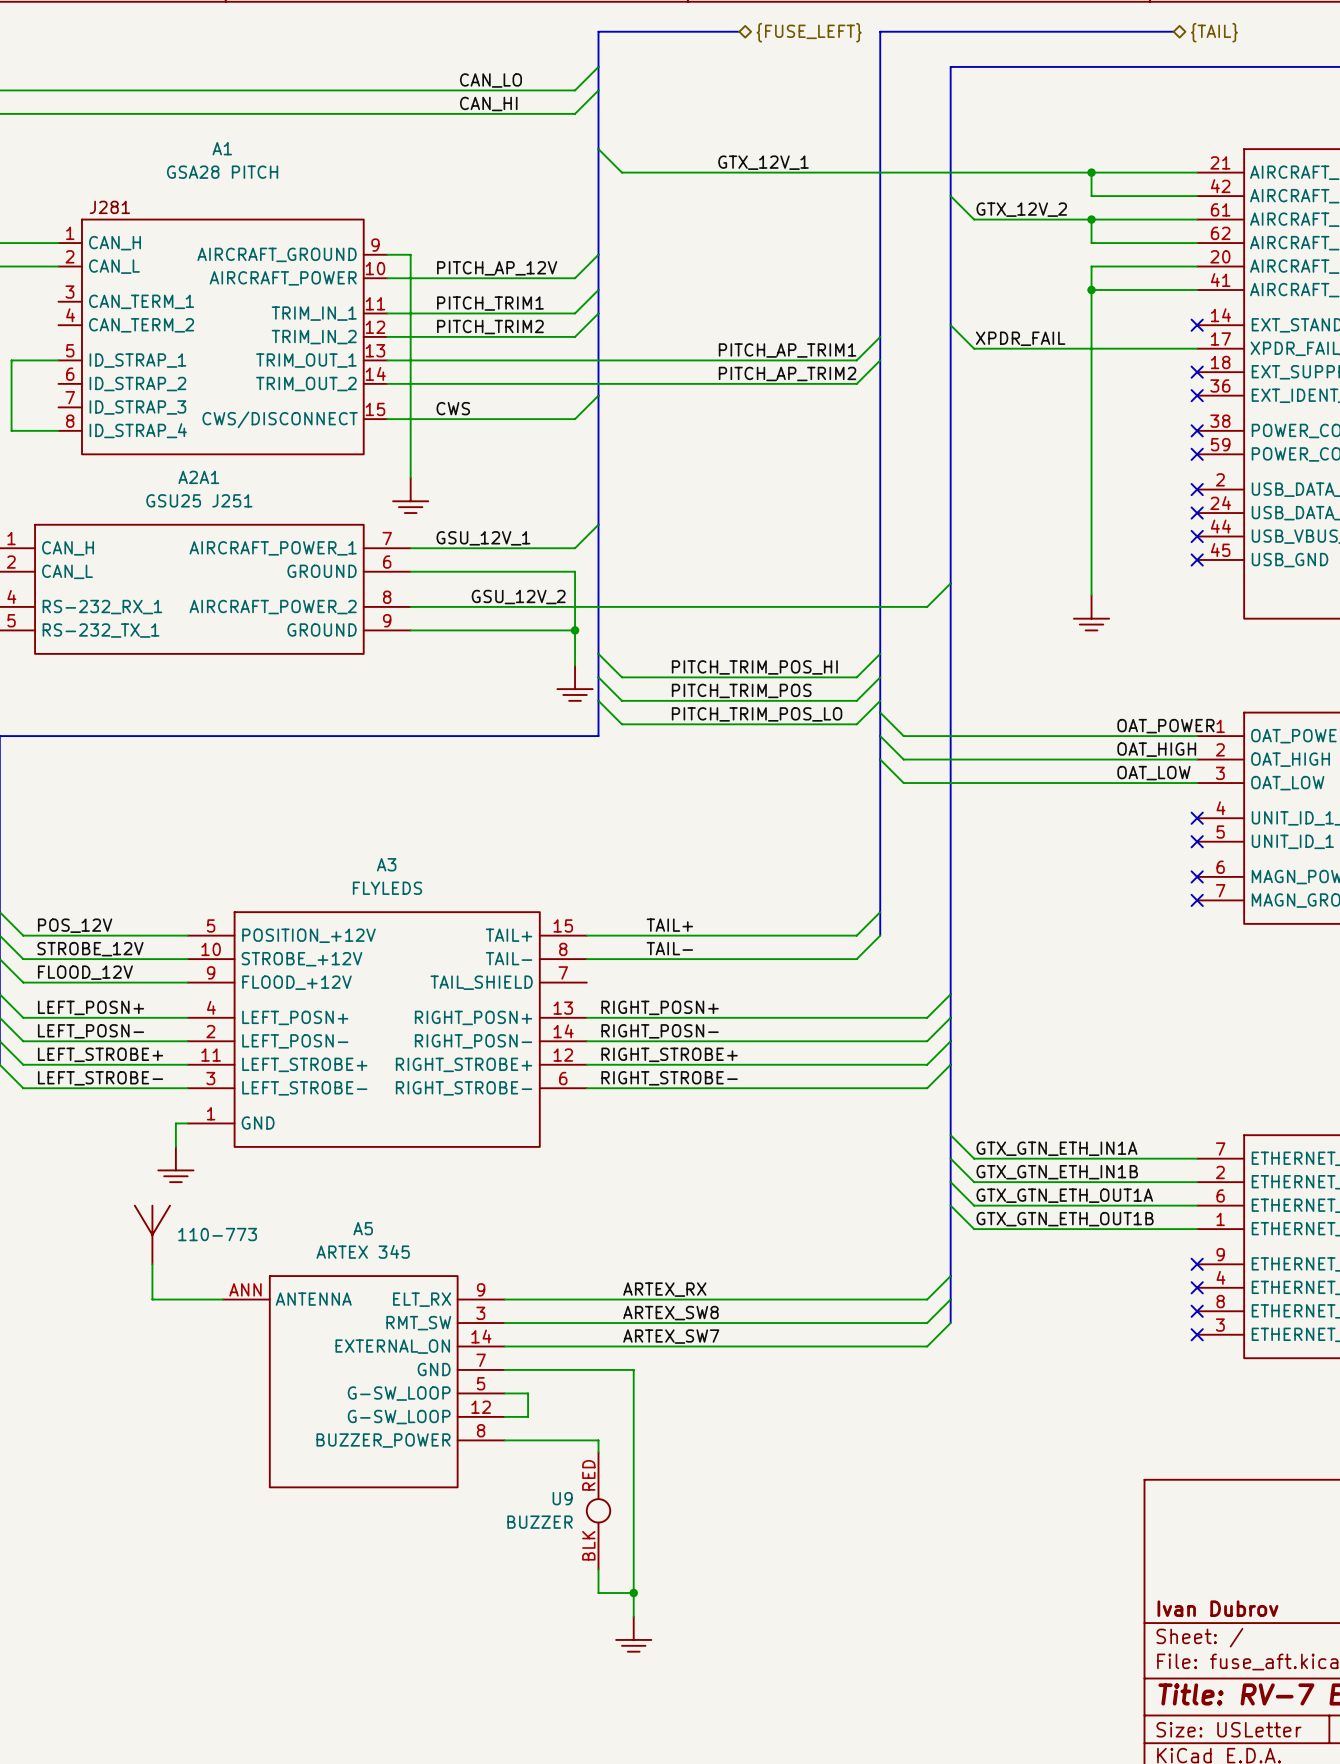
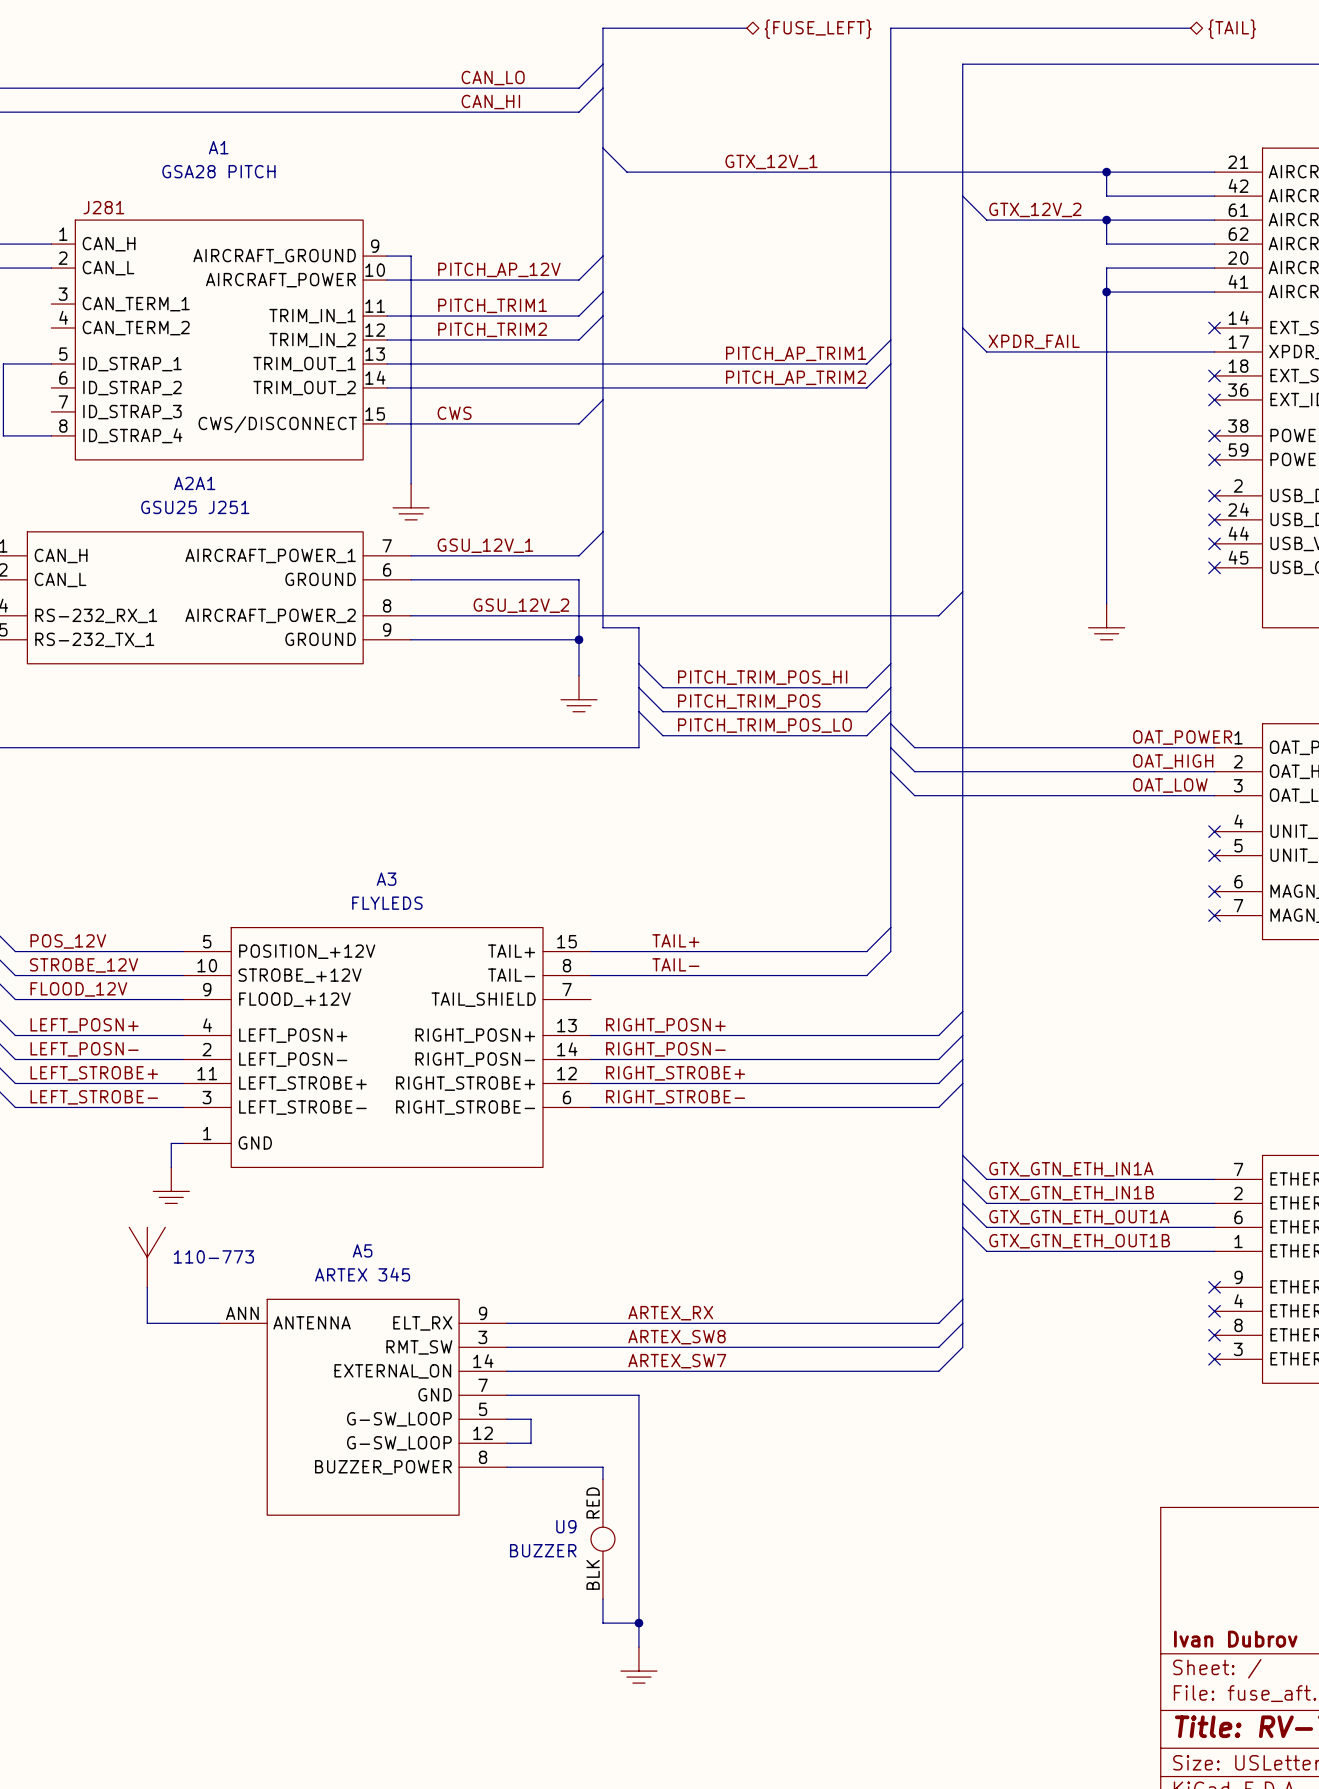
bus: (598, 618) (598, 736) -> (602, 627) (638, 627) (638, 747) (602, 747)
wire: (598, 653) (621, 677) (657, 677) -> (638, 663) (662, 687)
wire: (598, 677) (621, 700) (657, 700) -> (638, 687) (662, 711)
wire: (598, 700) (621, 724) (657, 724) -> (638, 711) (662, 735)

